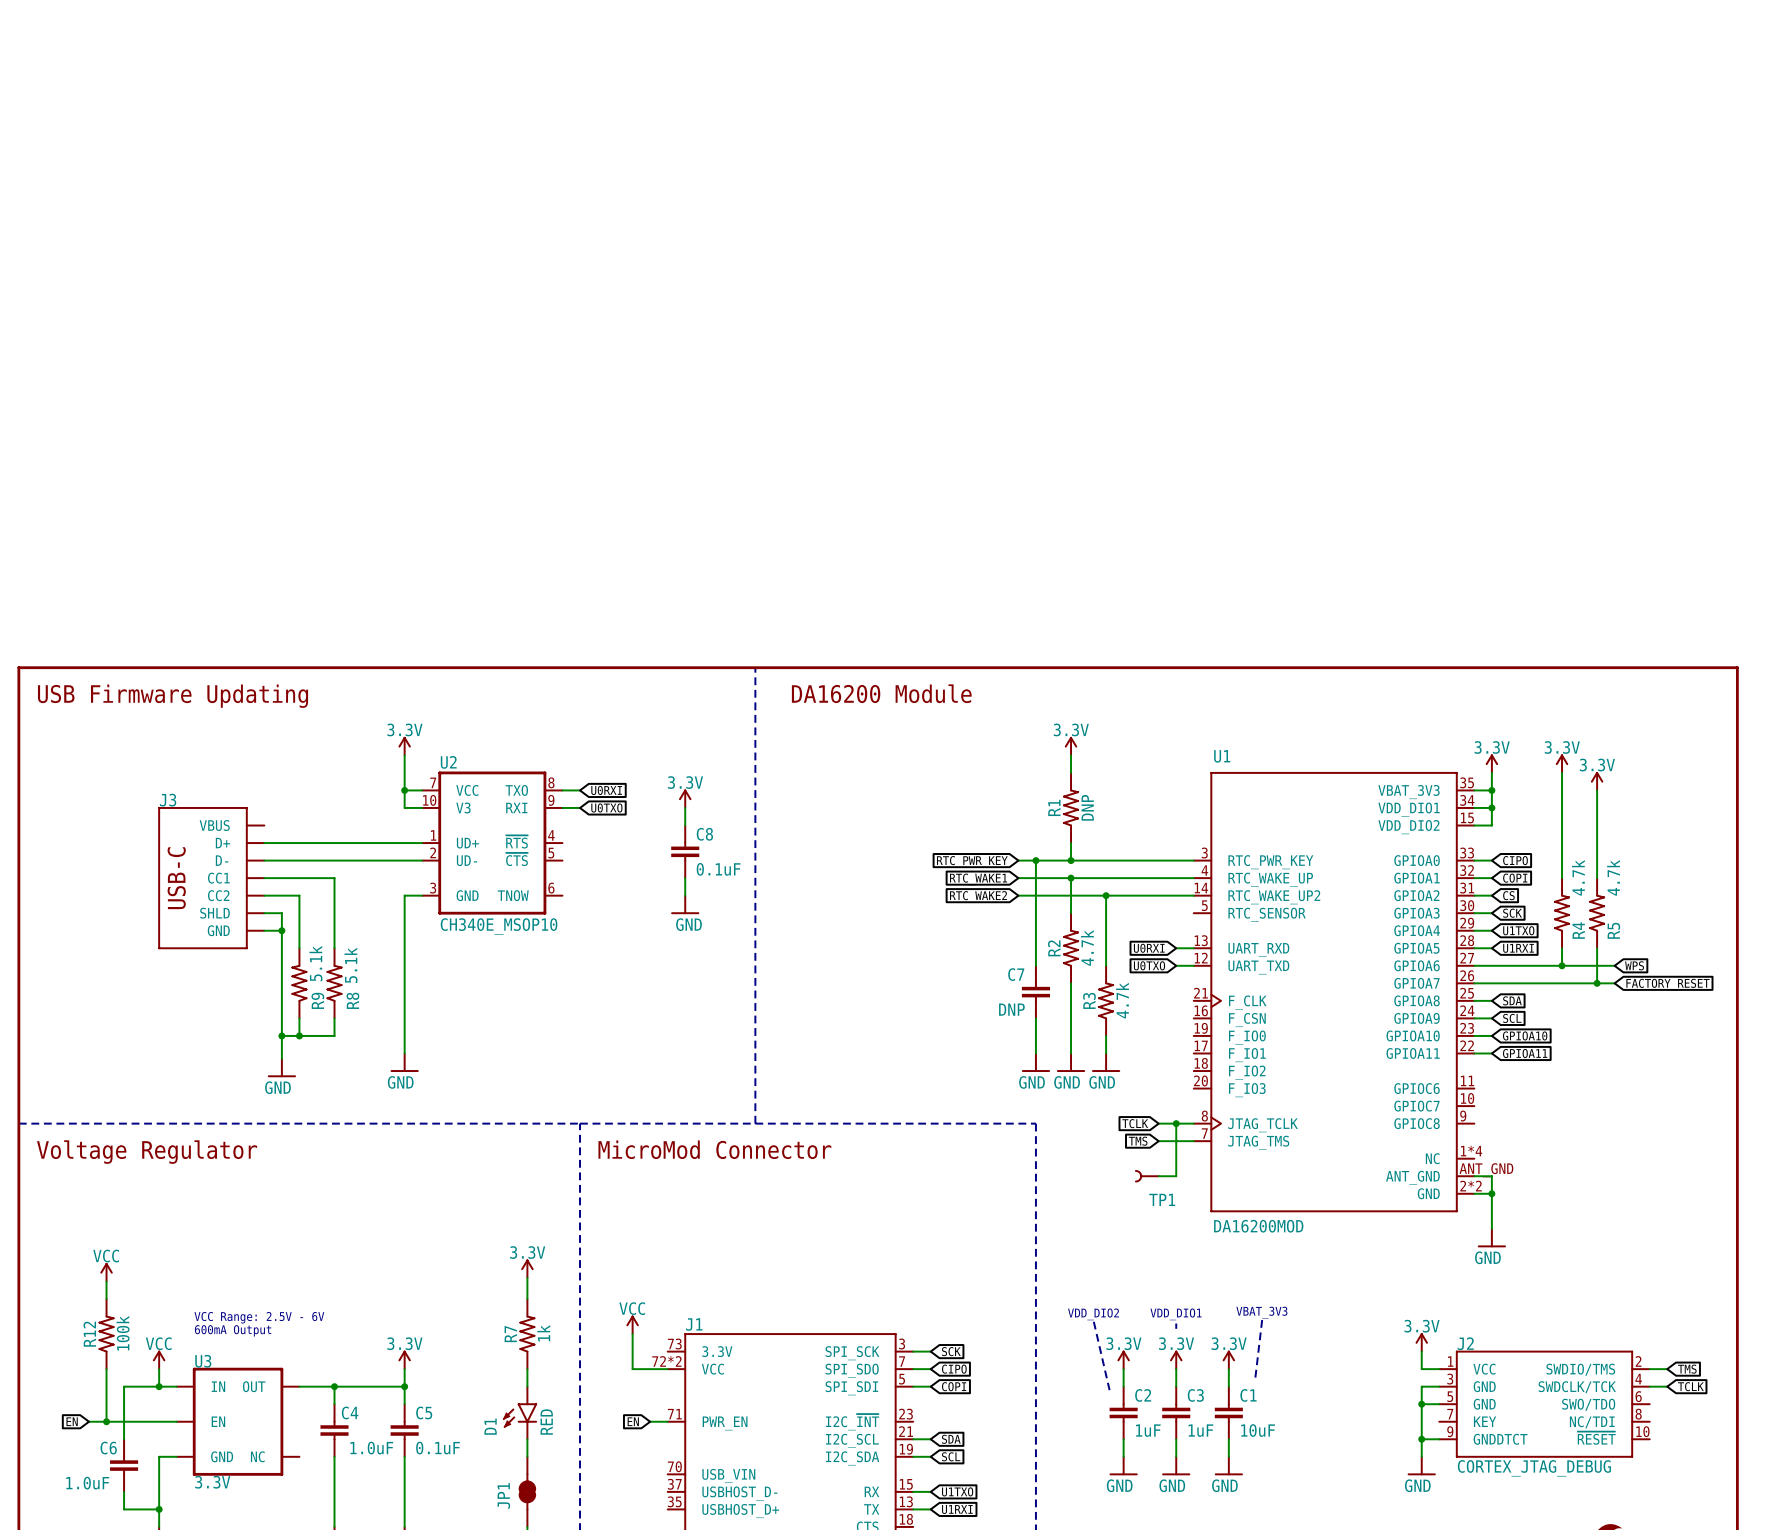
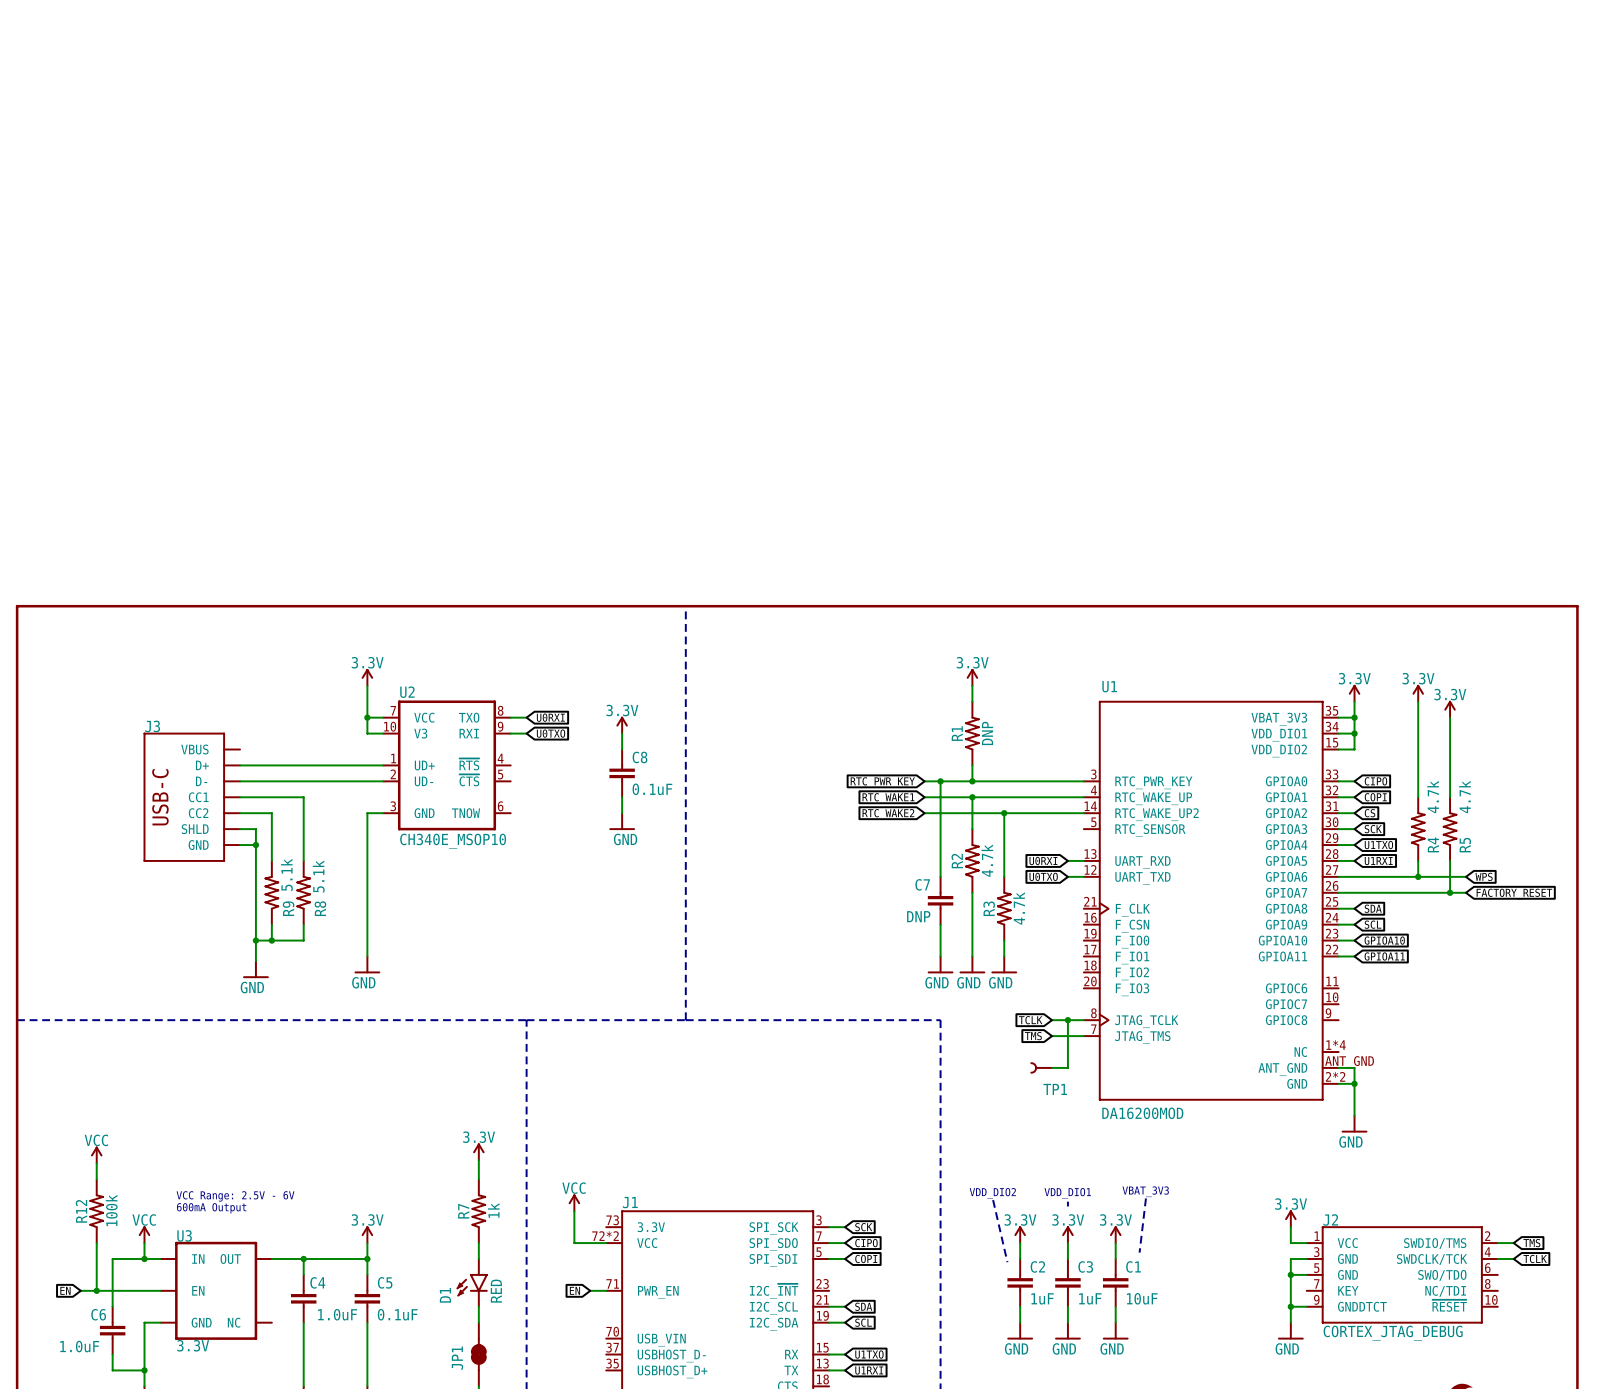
text: DA16200 Module (881, 693) -> none
text: USB Firmware Updating (173, 696) -> none
text: MicroMod Connector (714, 1149) -> none
text: Voltage Regulator (147, 1152) -> none

